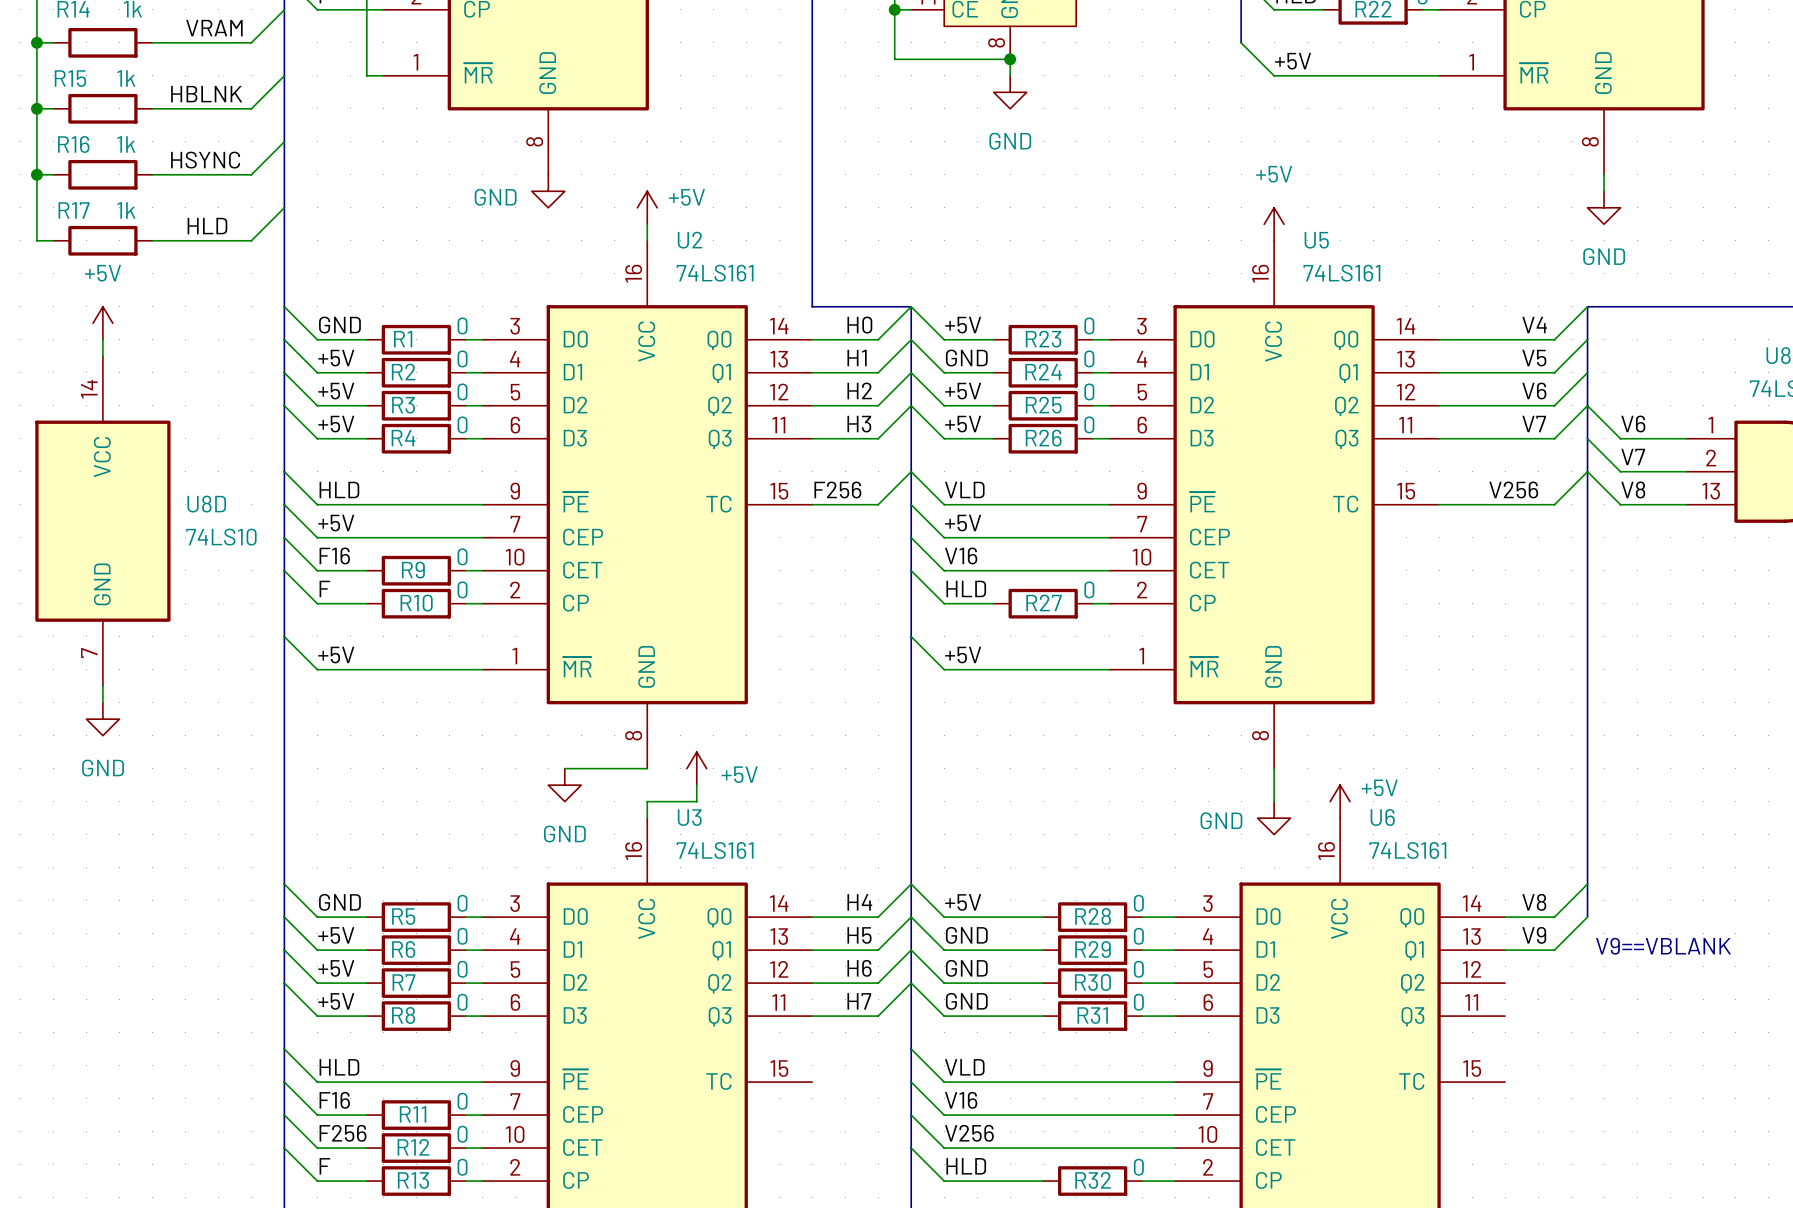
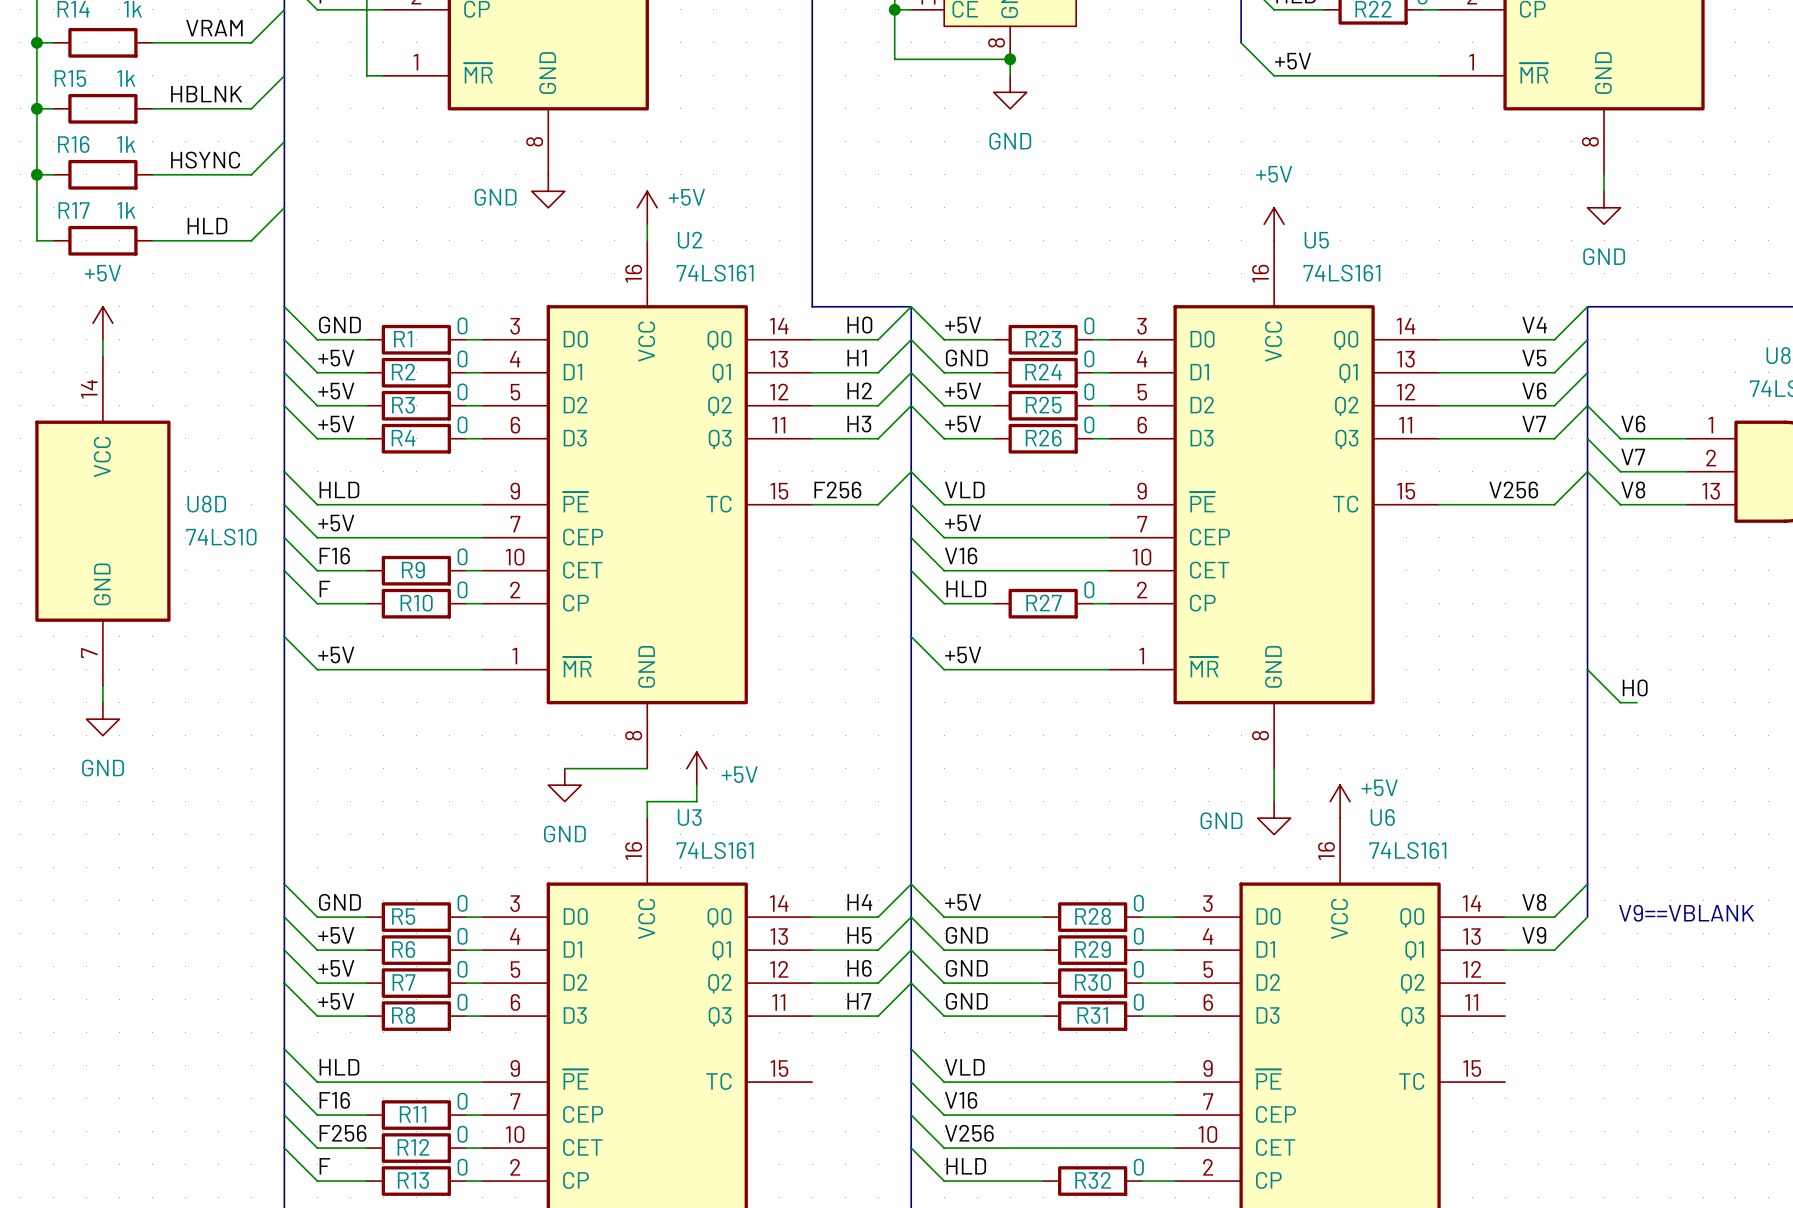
wire: none -> (1587, 669) (1620, 702) (1637, 702)
label: none -> H0 (1635, 687)
text position: V9==VBLANK (1663, 946) -> V9==VBLANK (1686, 913)

